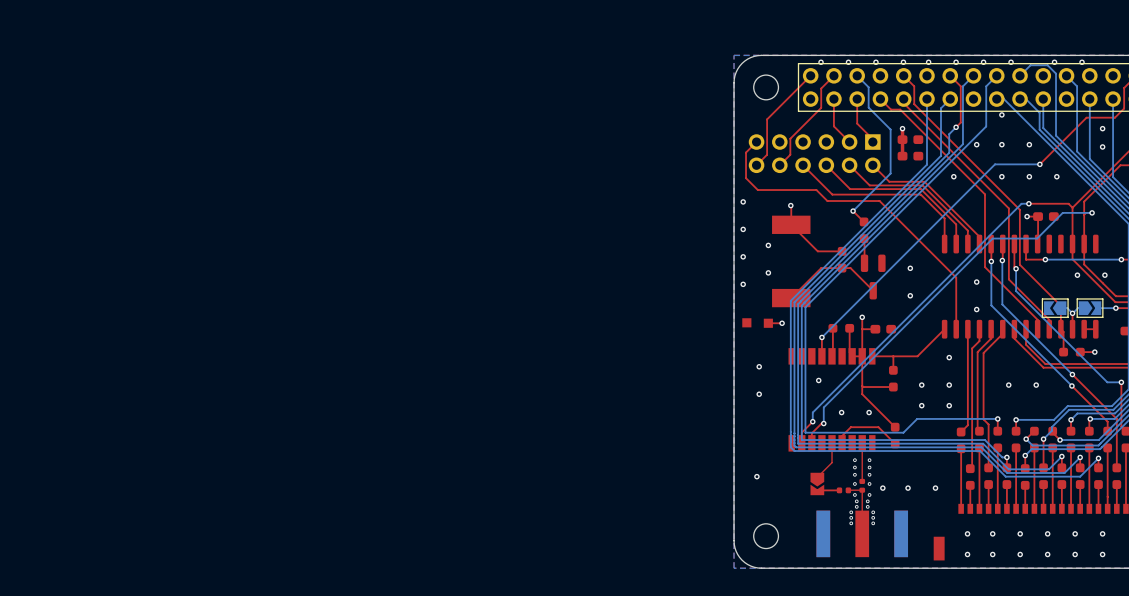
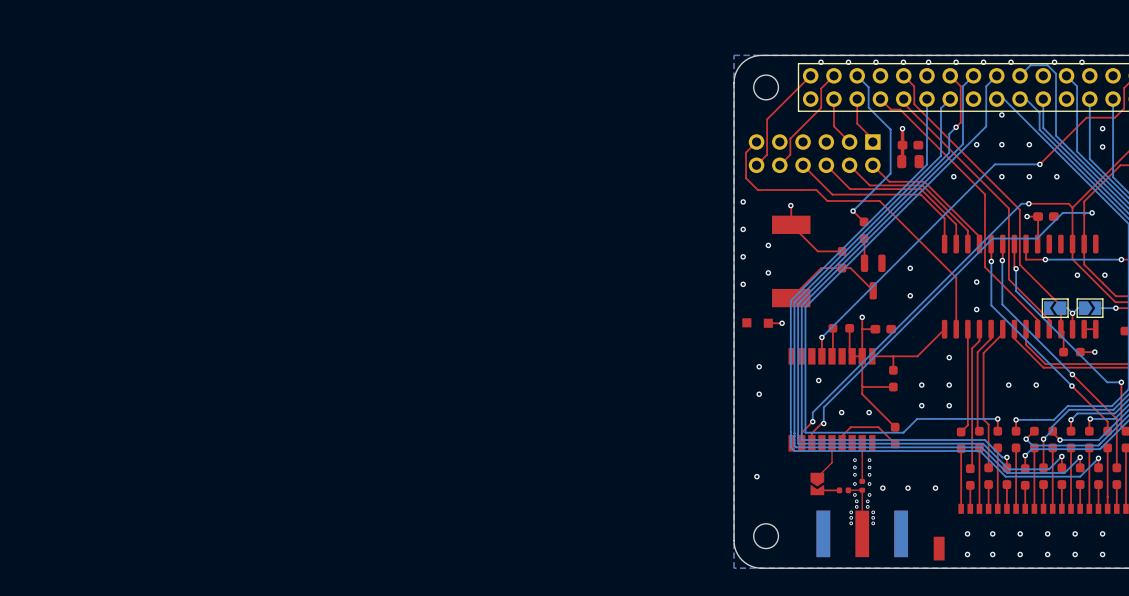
part: (910, 139) -> none
part: none -> (910, 145)
part: (910, 156) -> none
part: none -> (910, 161)

